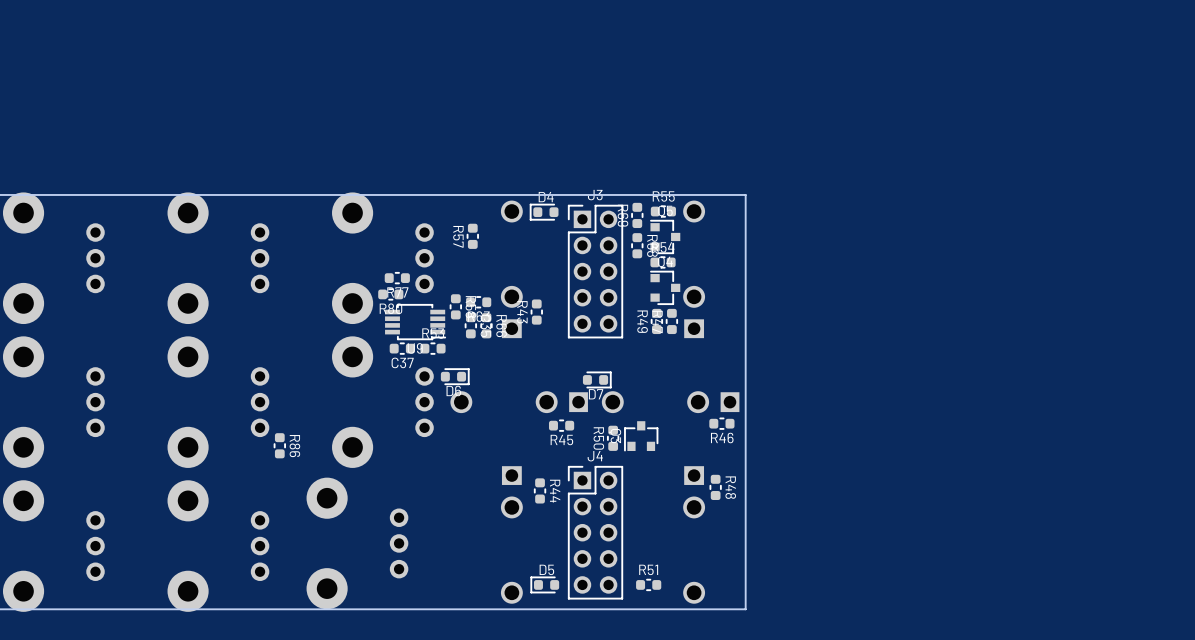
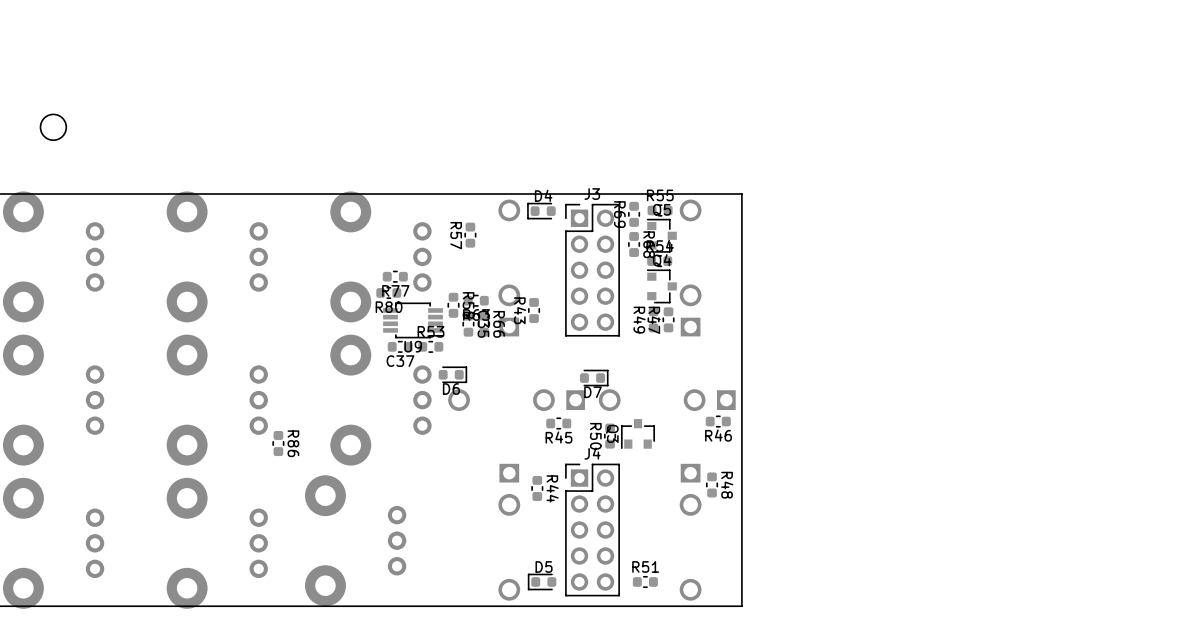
drawing: none -> [39, 113, 67, 141]

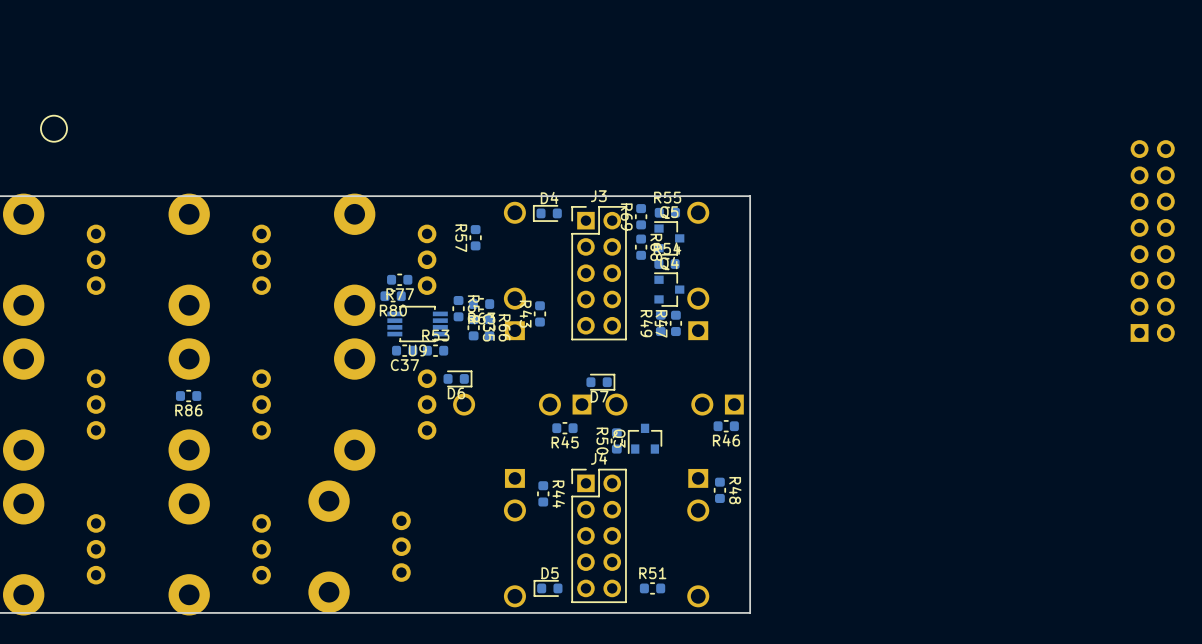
part: none -> (1152, 241)
R86 rotation: 0° (278, 443) -> 90° clockwise (188, 396)
R86 position: (278, 443) -> (188, 396)

